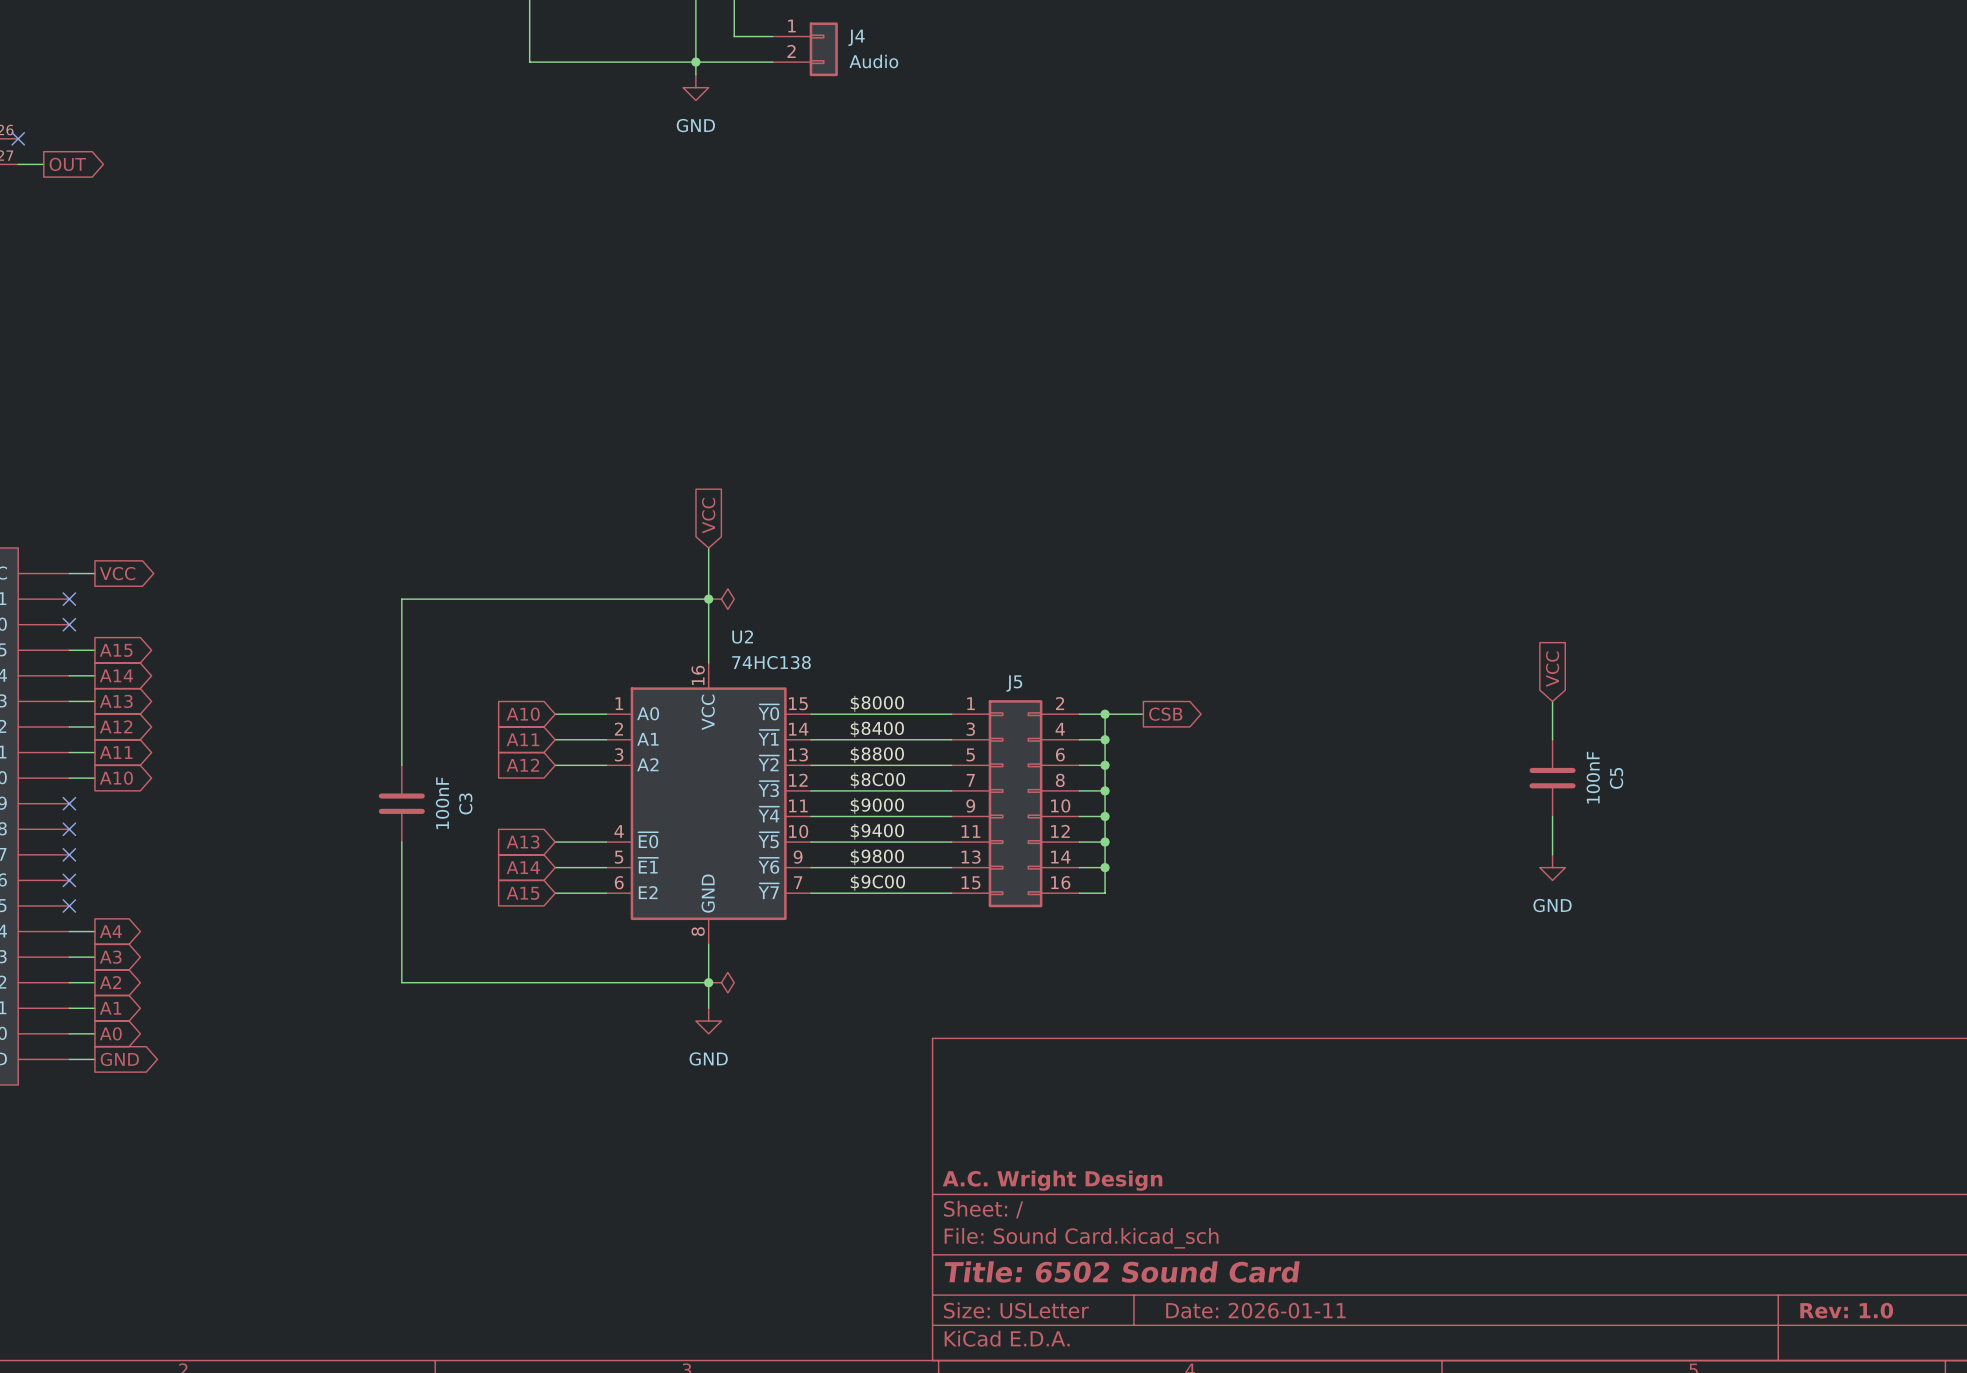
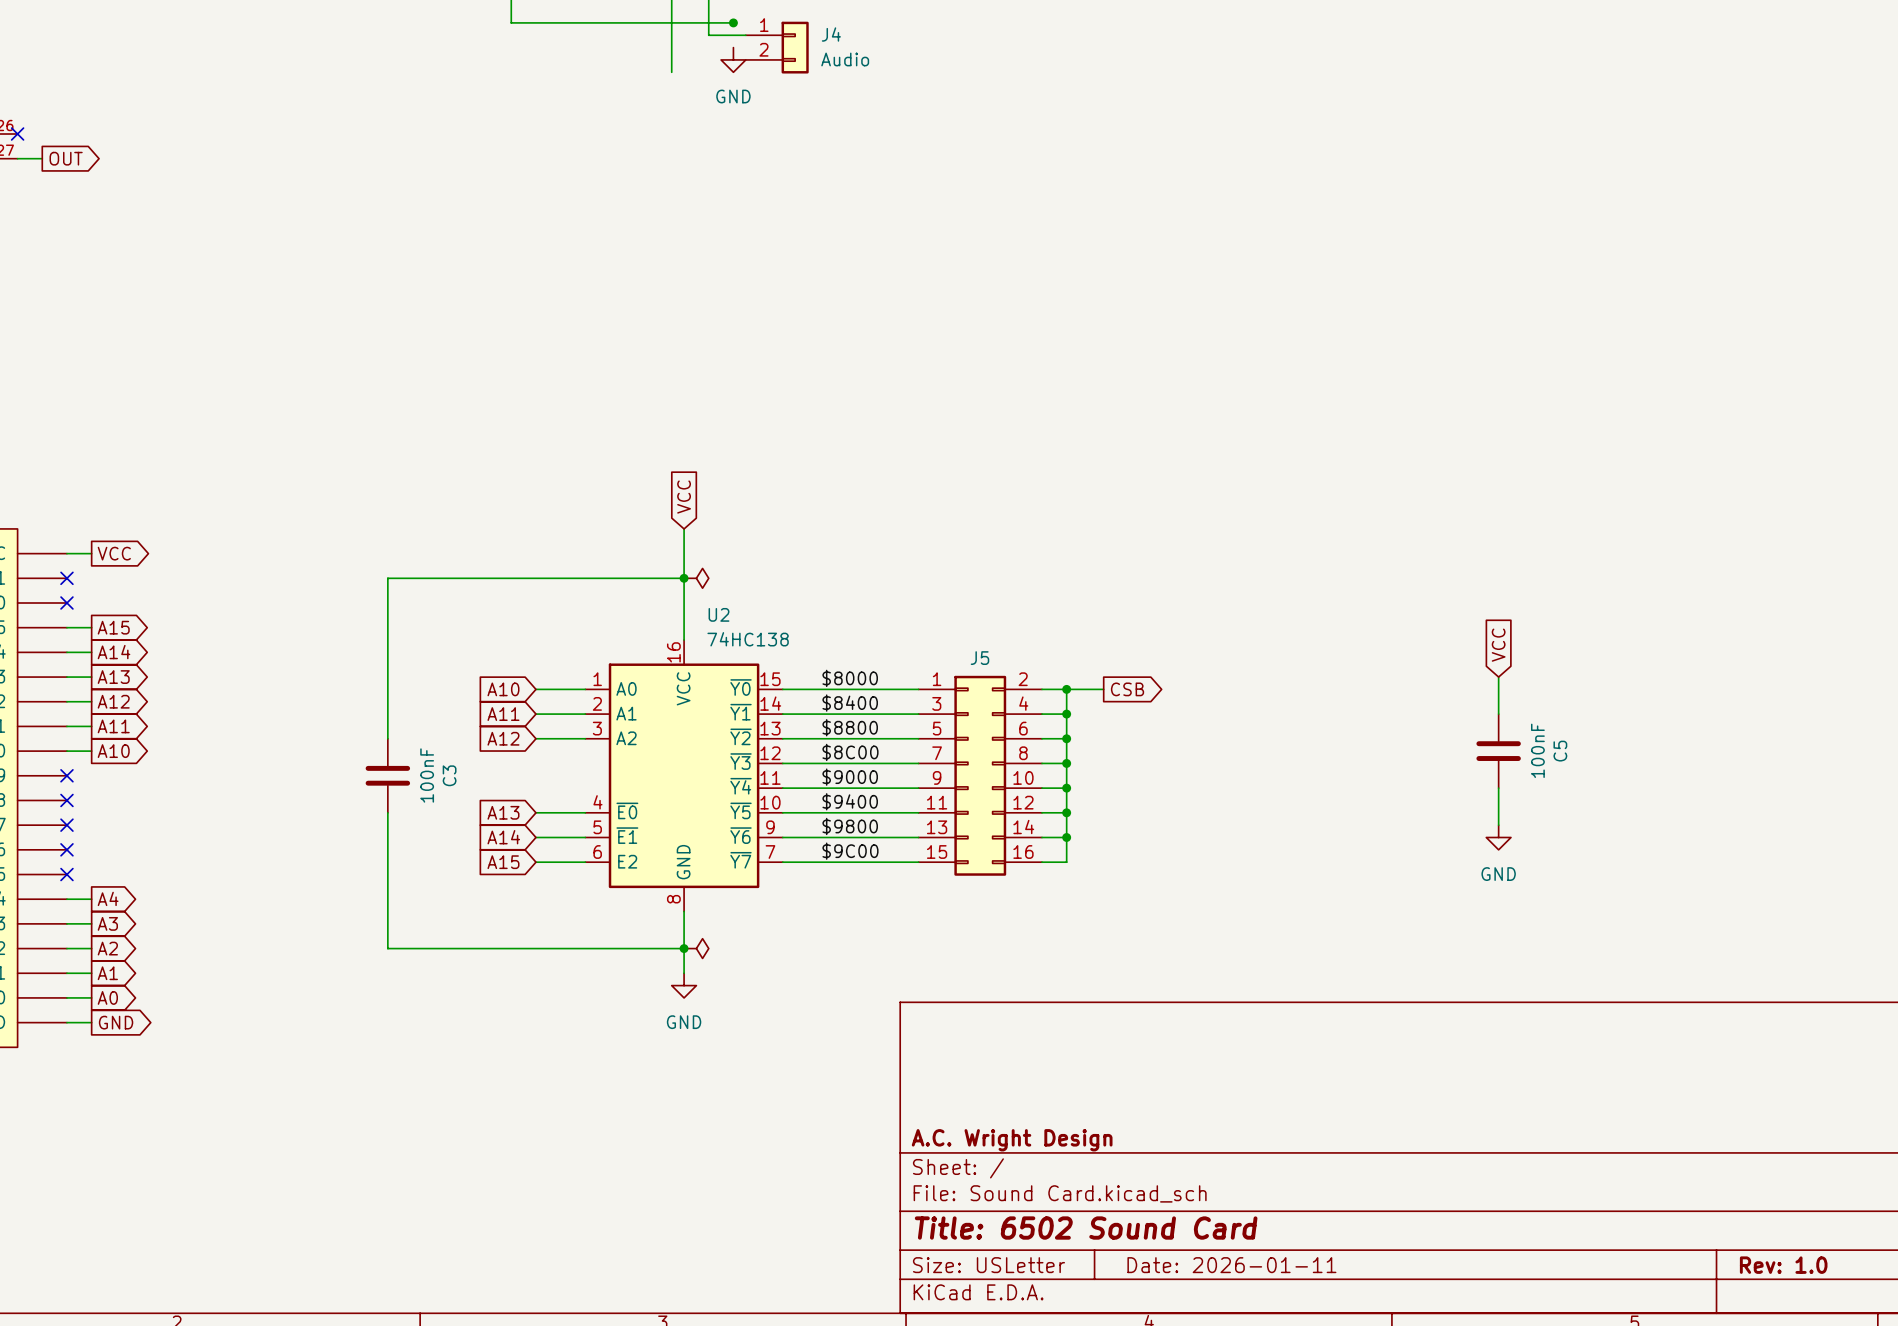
wire: (529, 23) (529, 62) (772, 62) -> (511, 22) (733, 22)
junction: none -> (733, 22)
junction: (695, 62) -> none
power symbol position: GND (695, 87) -> GND (733, 59)

